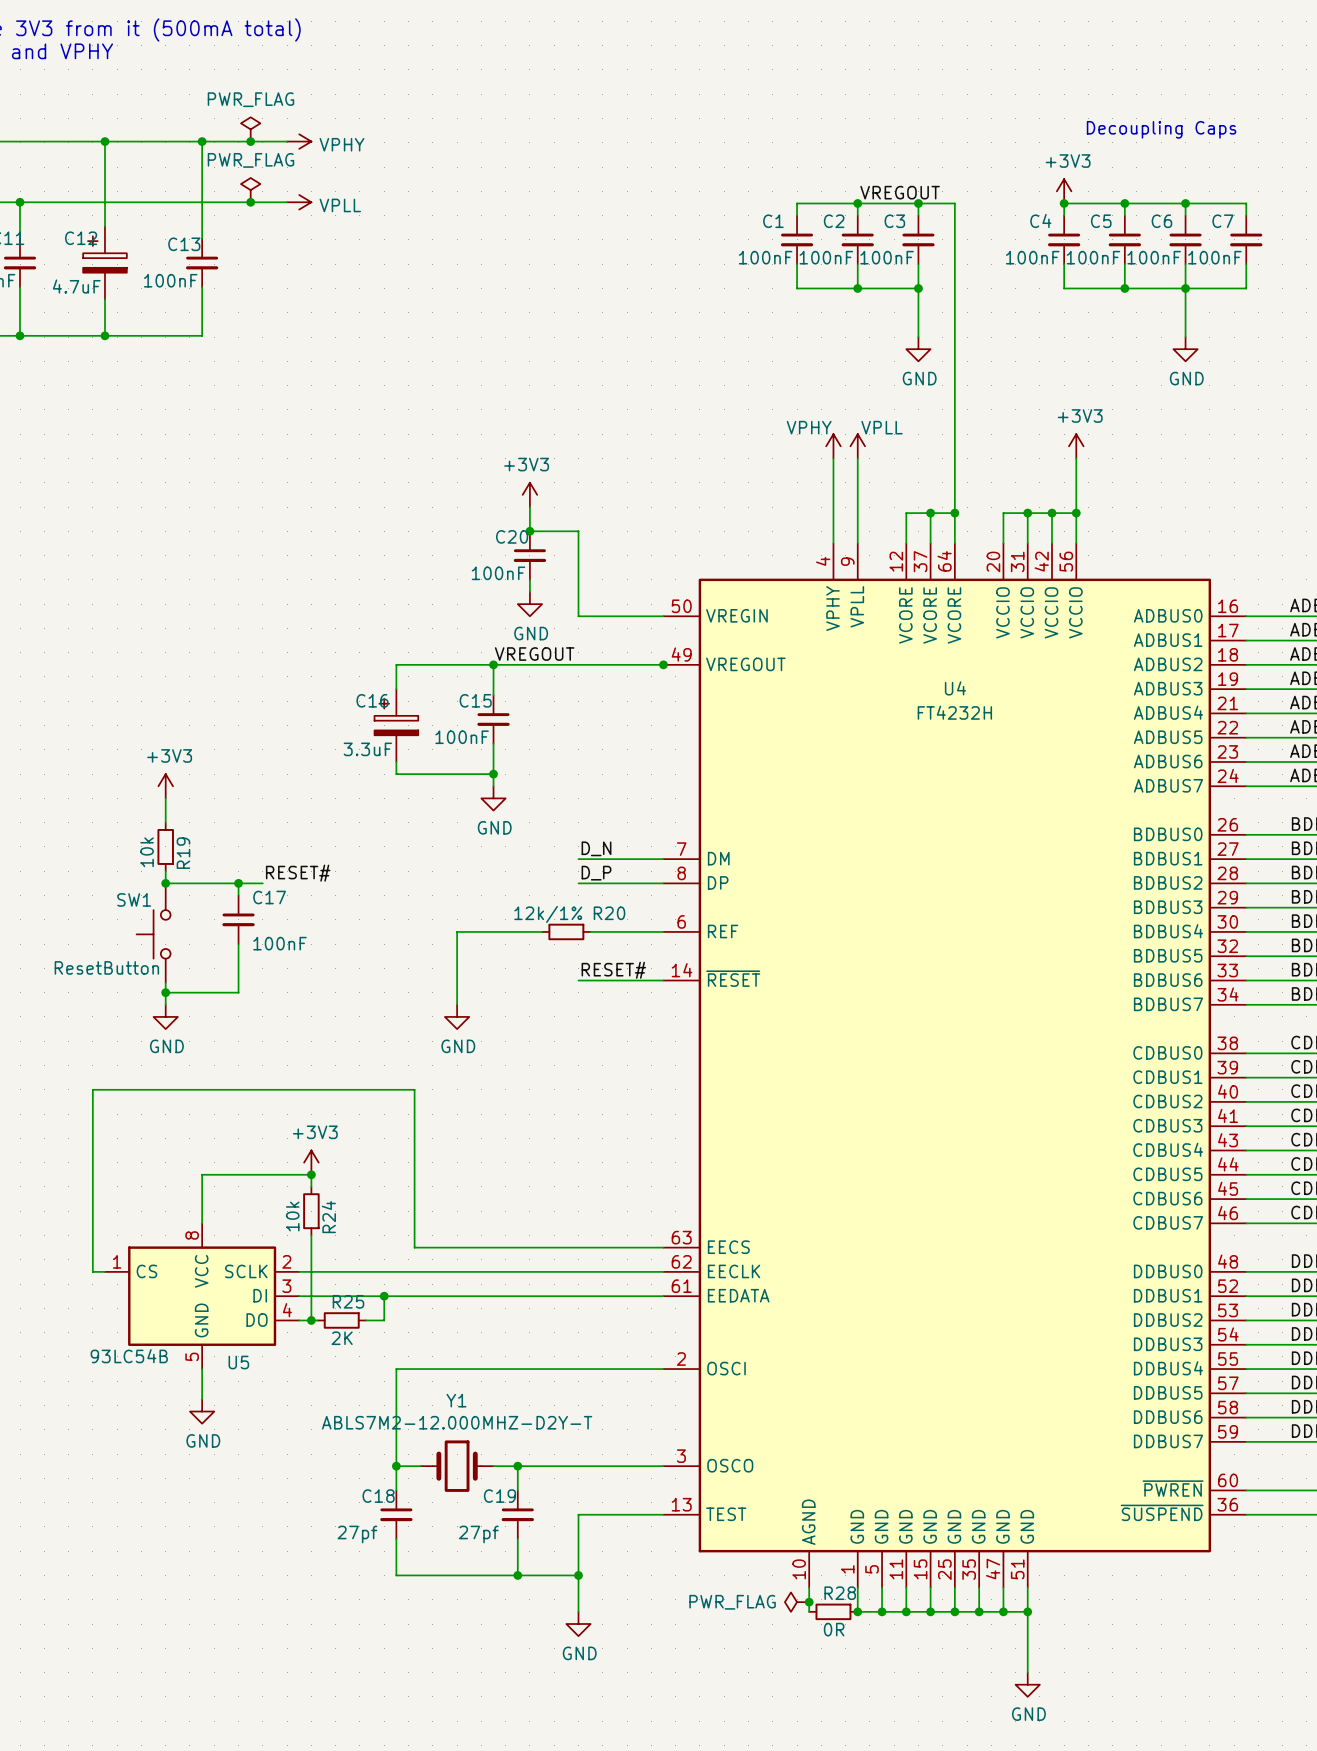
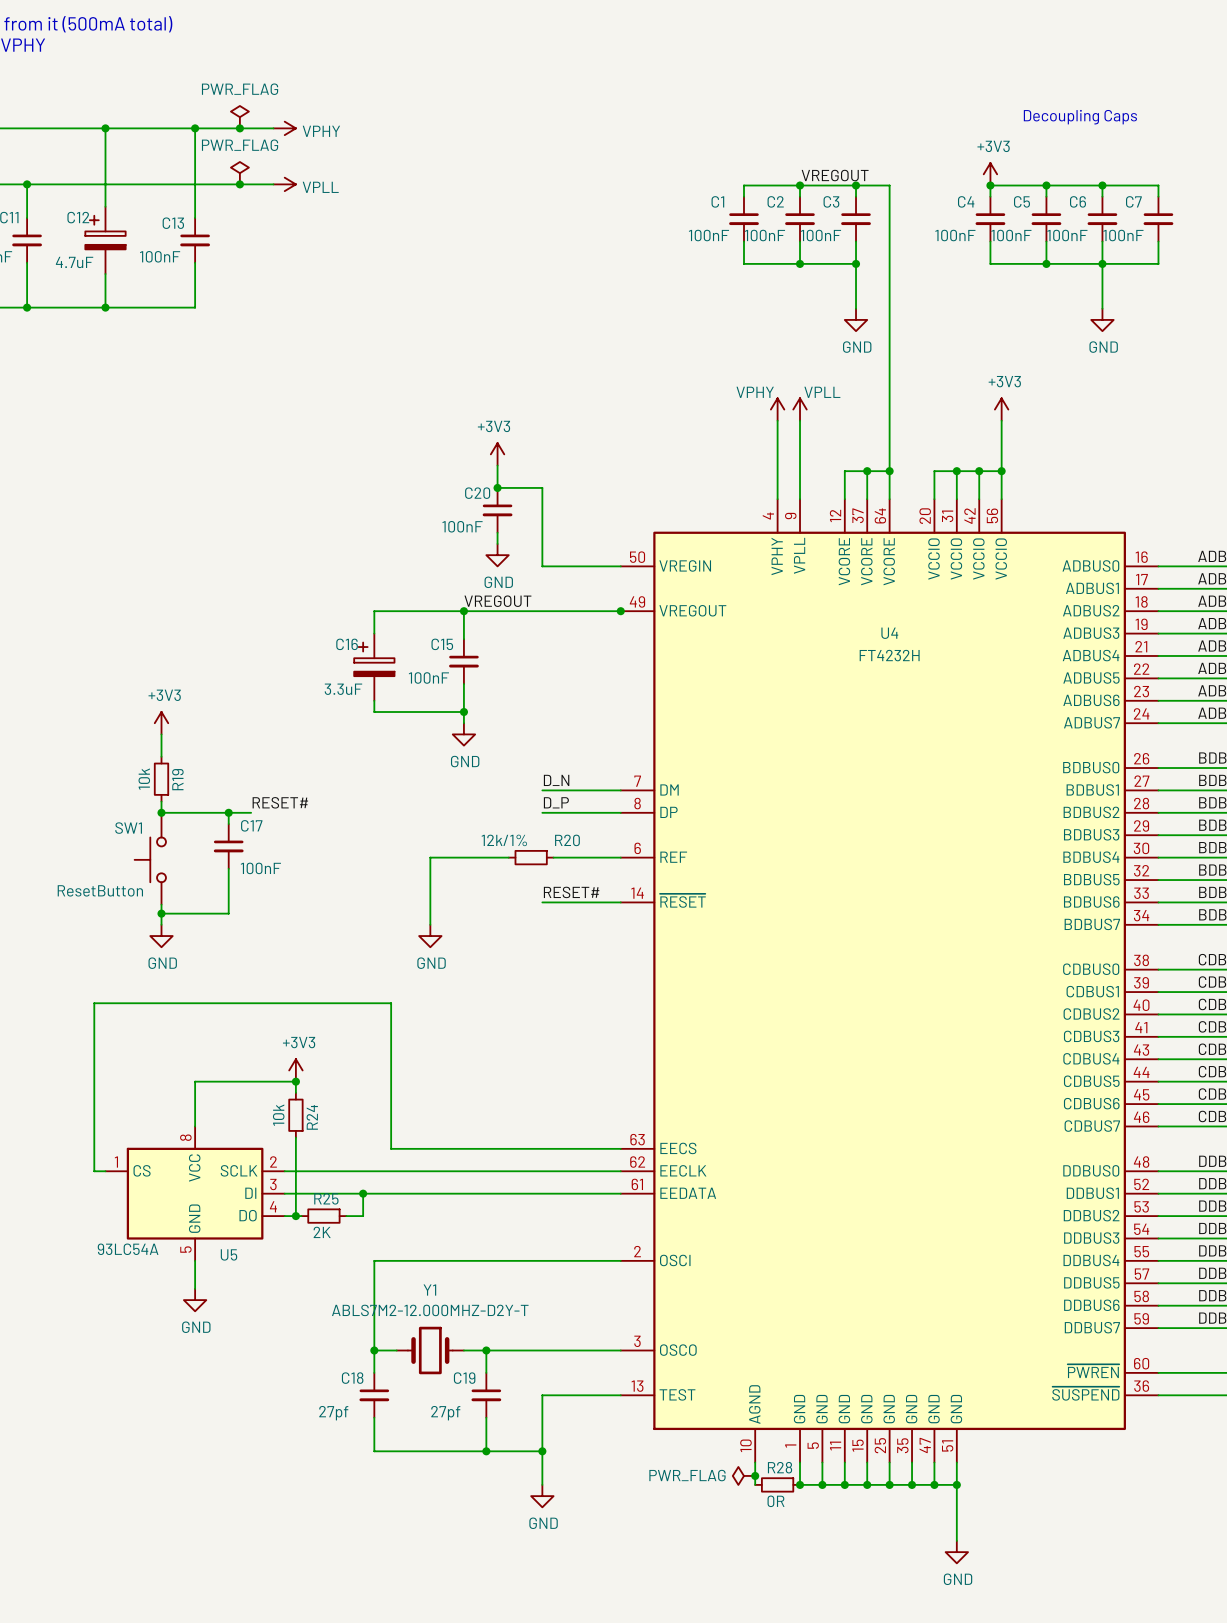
U5 value: 93LC54B (129, 1356) -> 93LC54A (128, 1249)

